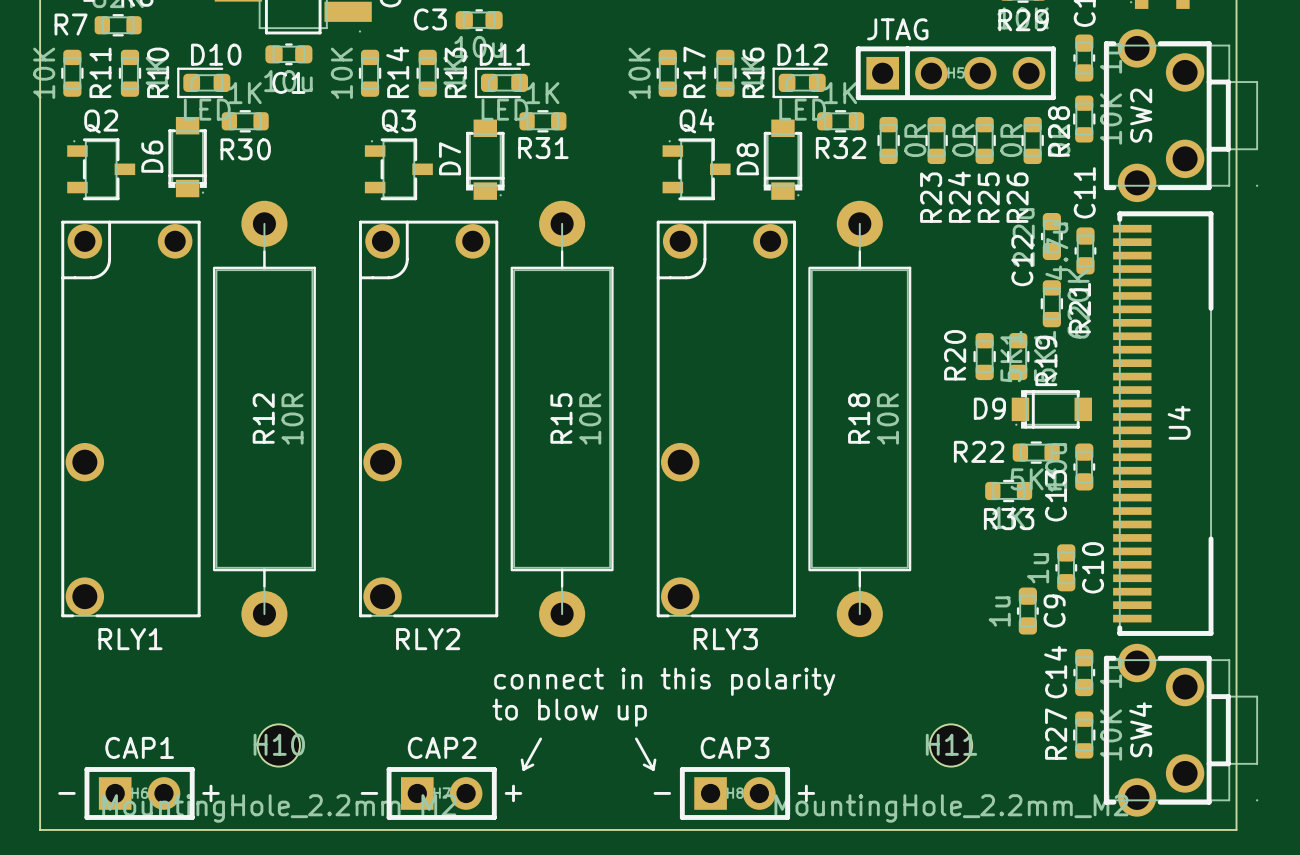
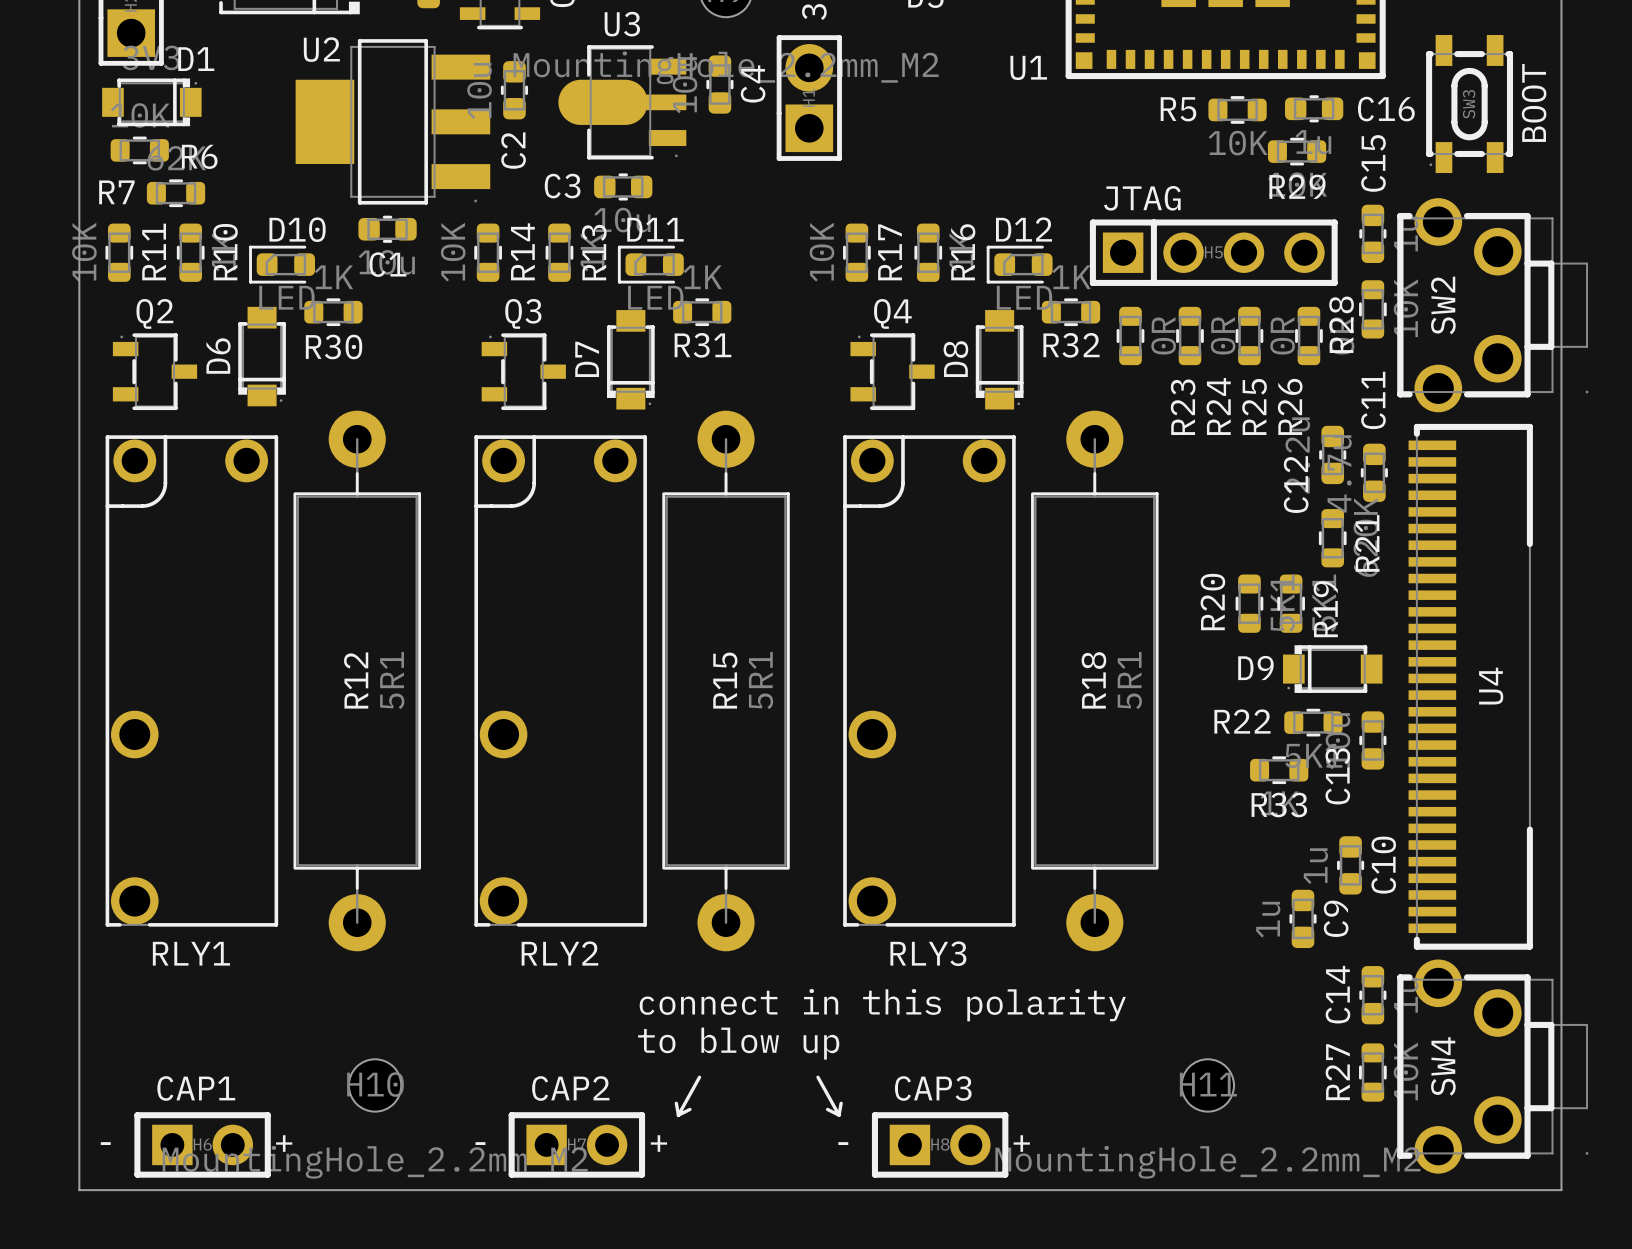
R12 value: 10R (292, 418) -> 5R1 (392, 680)
R15 value: 10R (590, 418) -> 5R1 (761, 680)
R18 value: 10R (887, 418) -> 5R1 (1129, 680)

